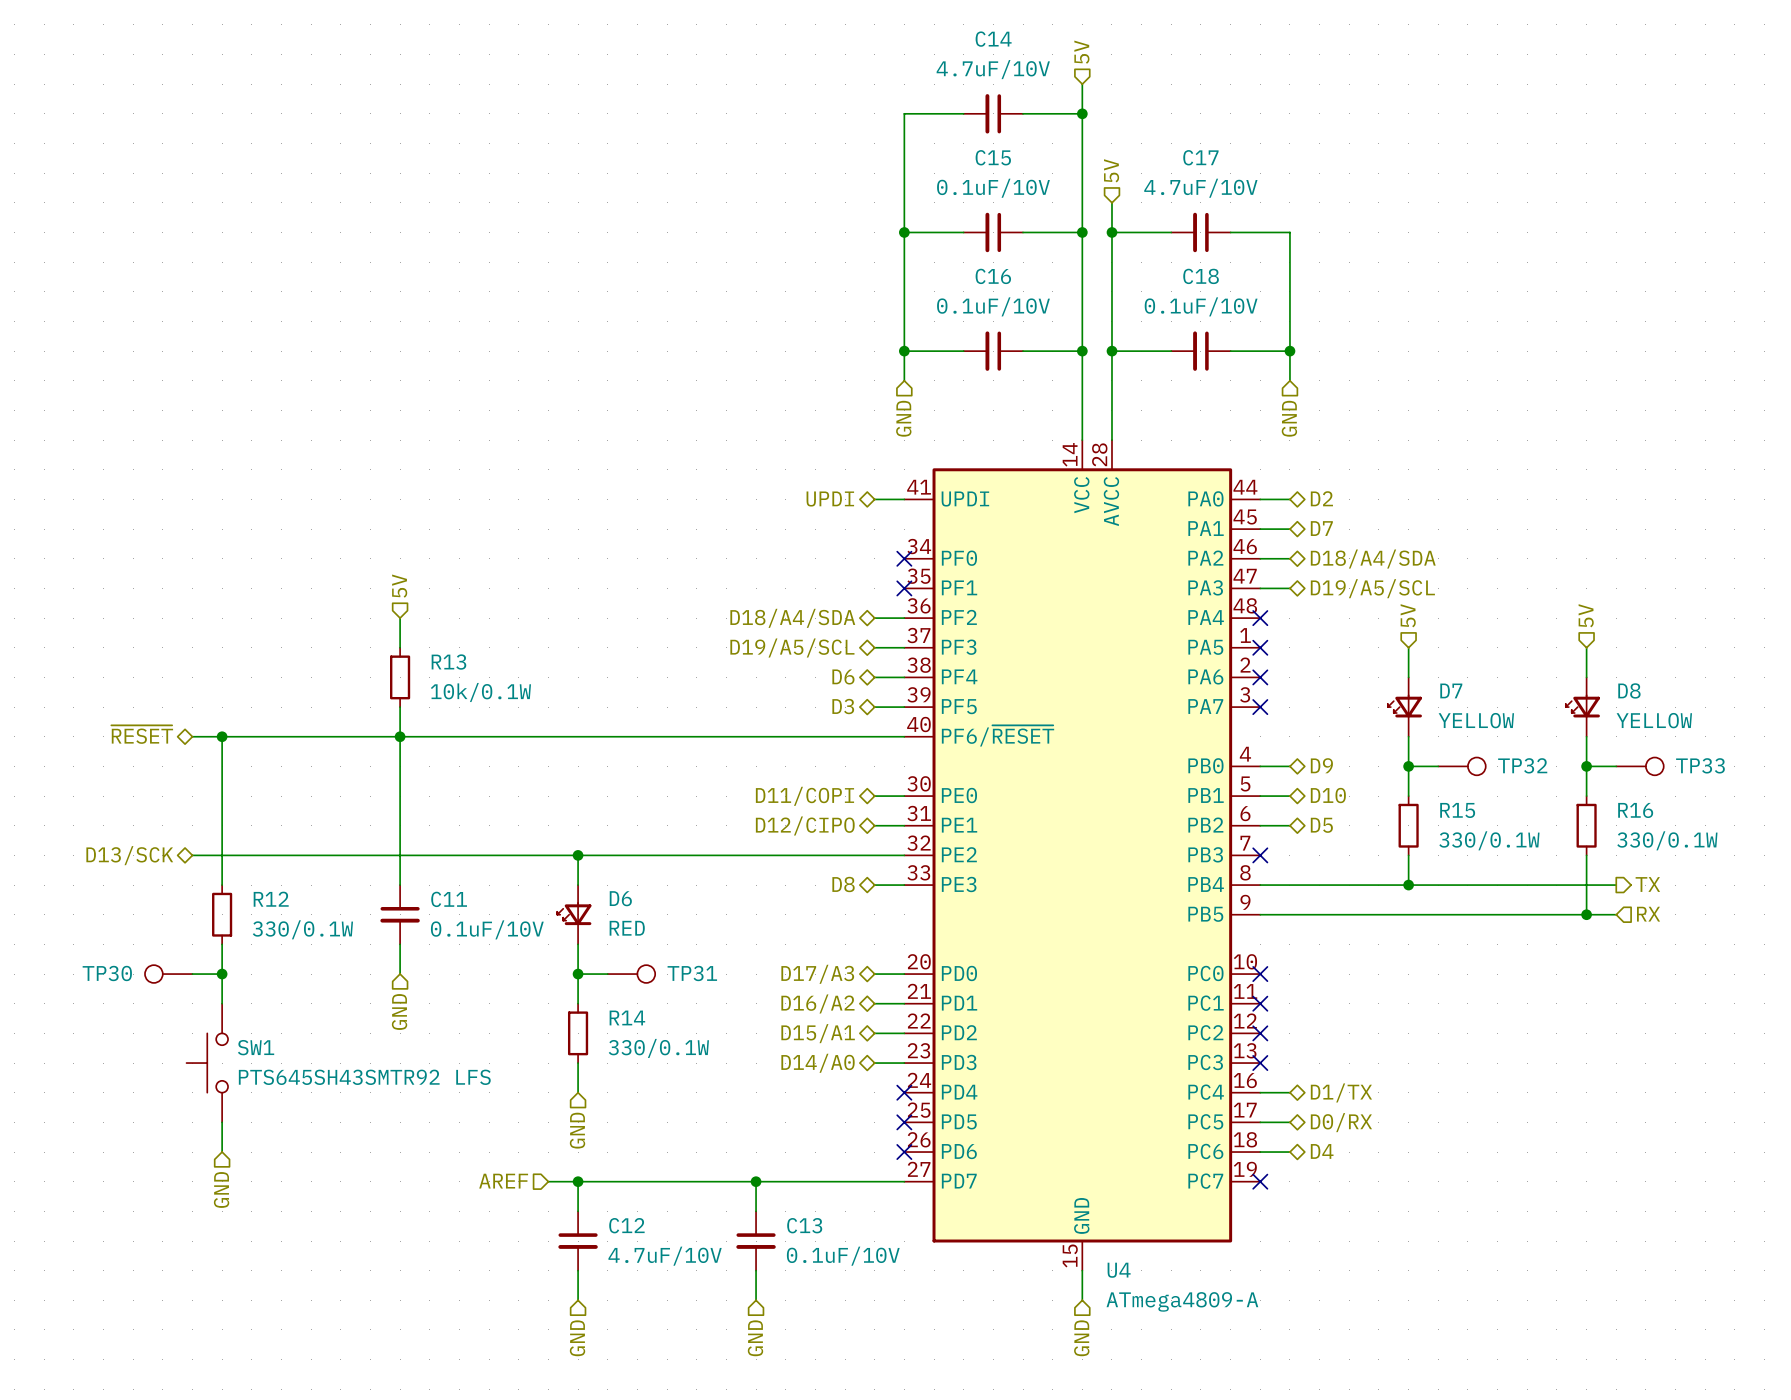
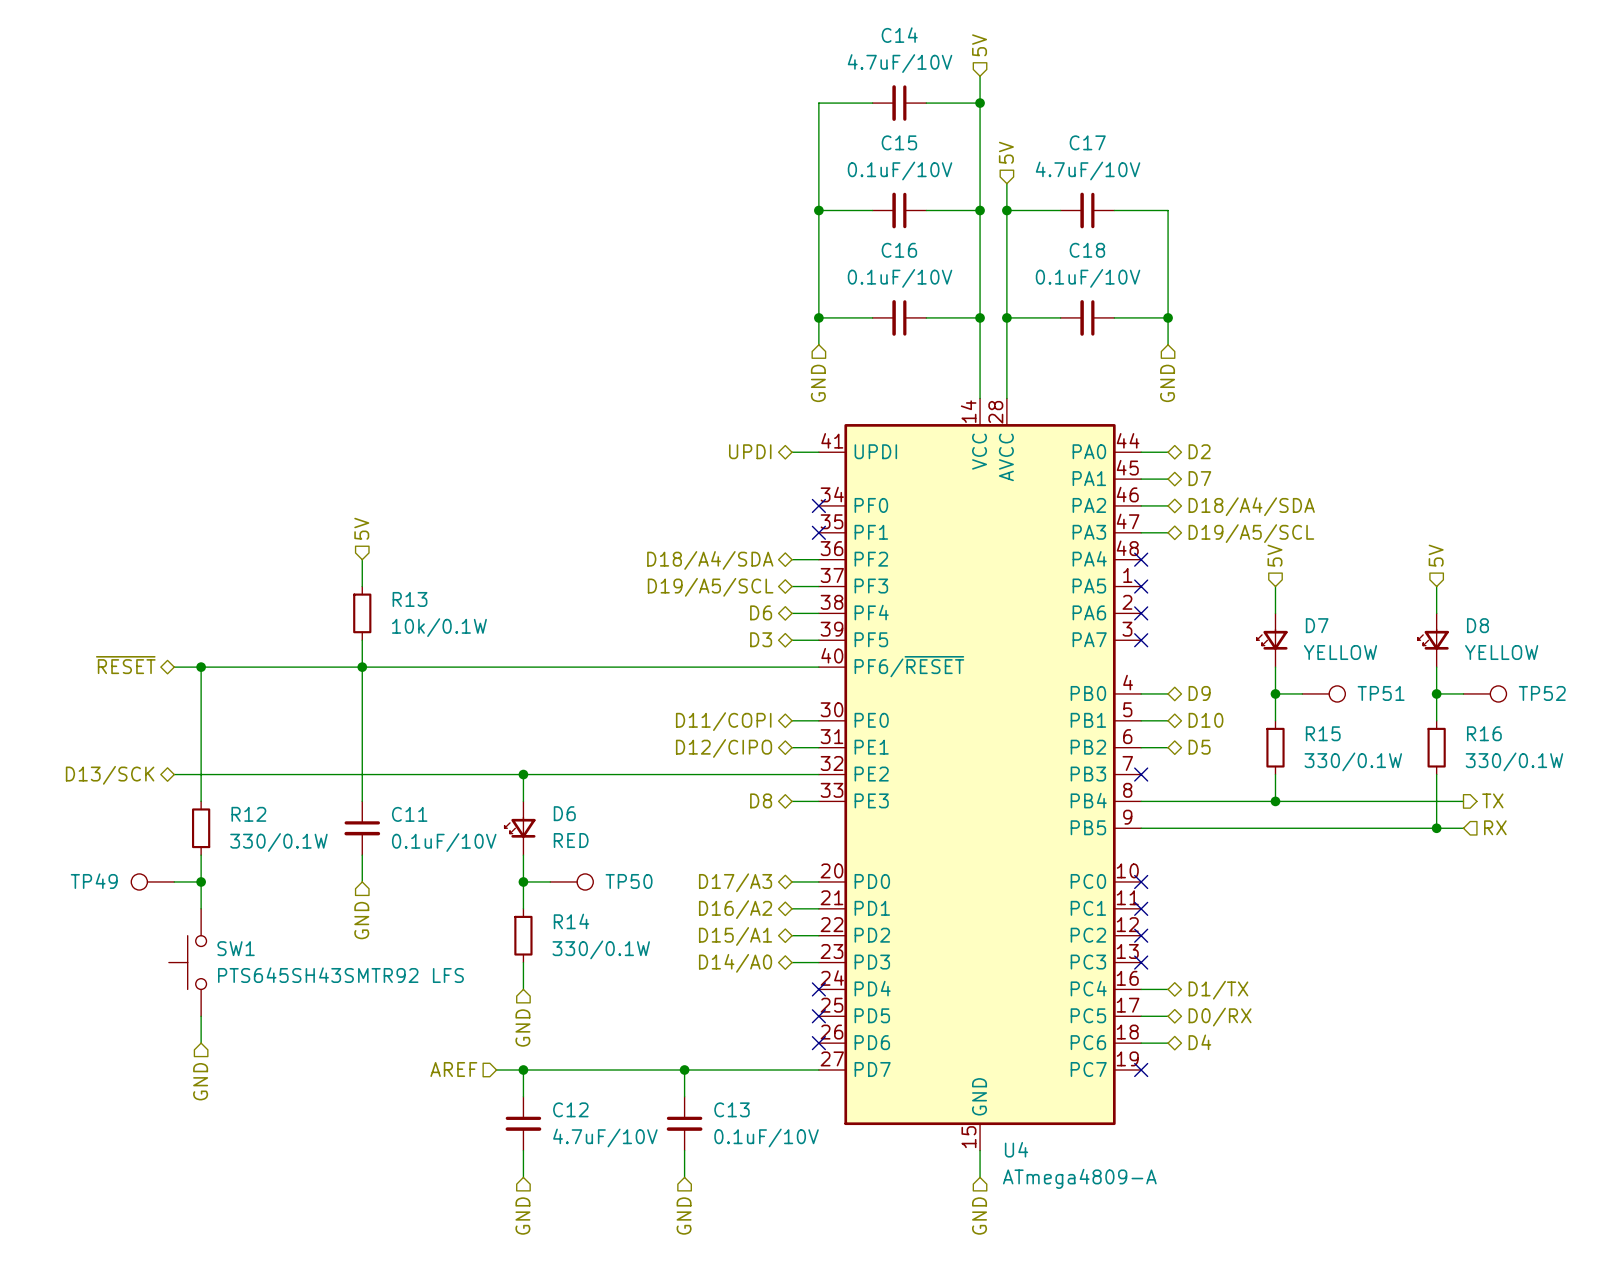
TP32 name: TP32 (1522, 765) -> TP51 (1381, 693)
TP33 name: TP33 (1700, 765) -> TP52 (1542, 693)
TP30 name: TP30 (107, 973) -> TP49 (94, 881)
TP31 name: TP31 (692, 973) -> TP50 (629, 881)

